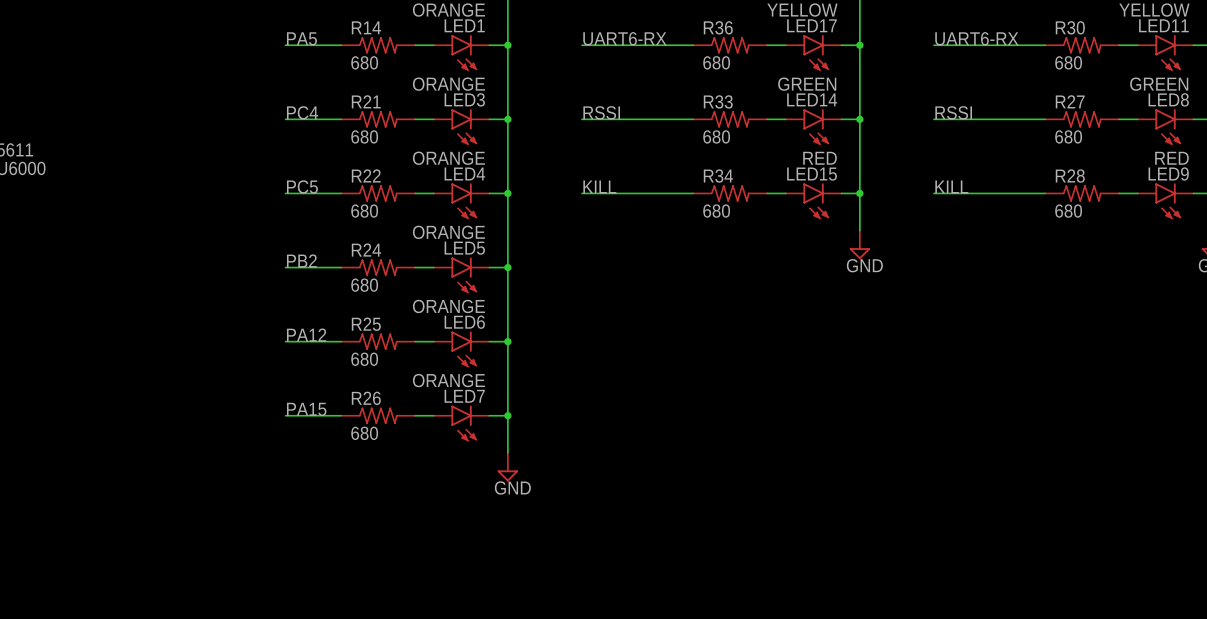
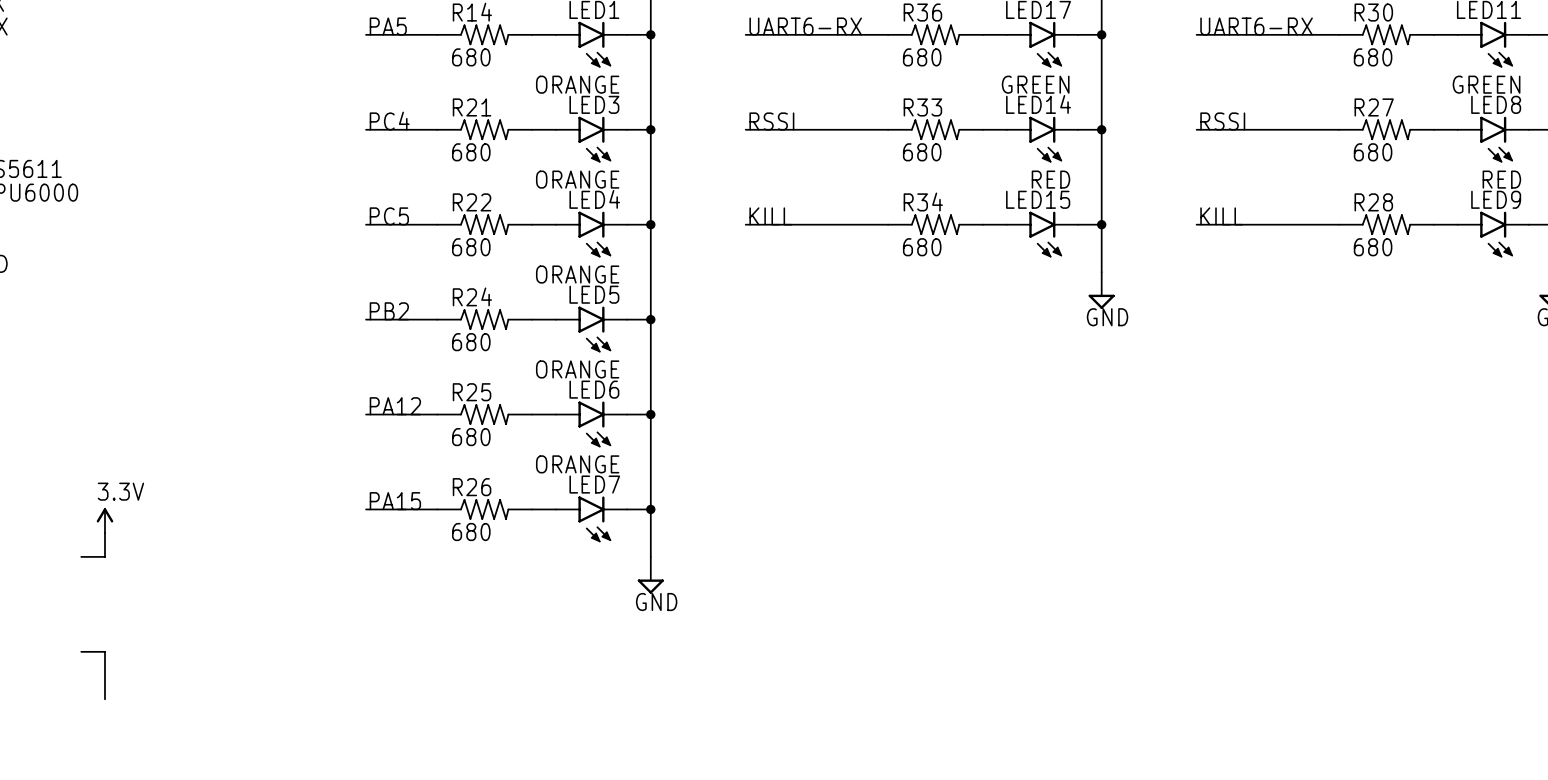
power symbol: none -> 3.3V (104, 520)
wire: none -> (104, 533) (104, 556) (81, 556)
wire: none -> (81, 651) (104, 651) (104, 699)

